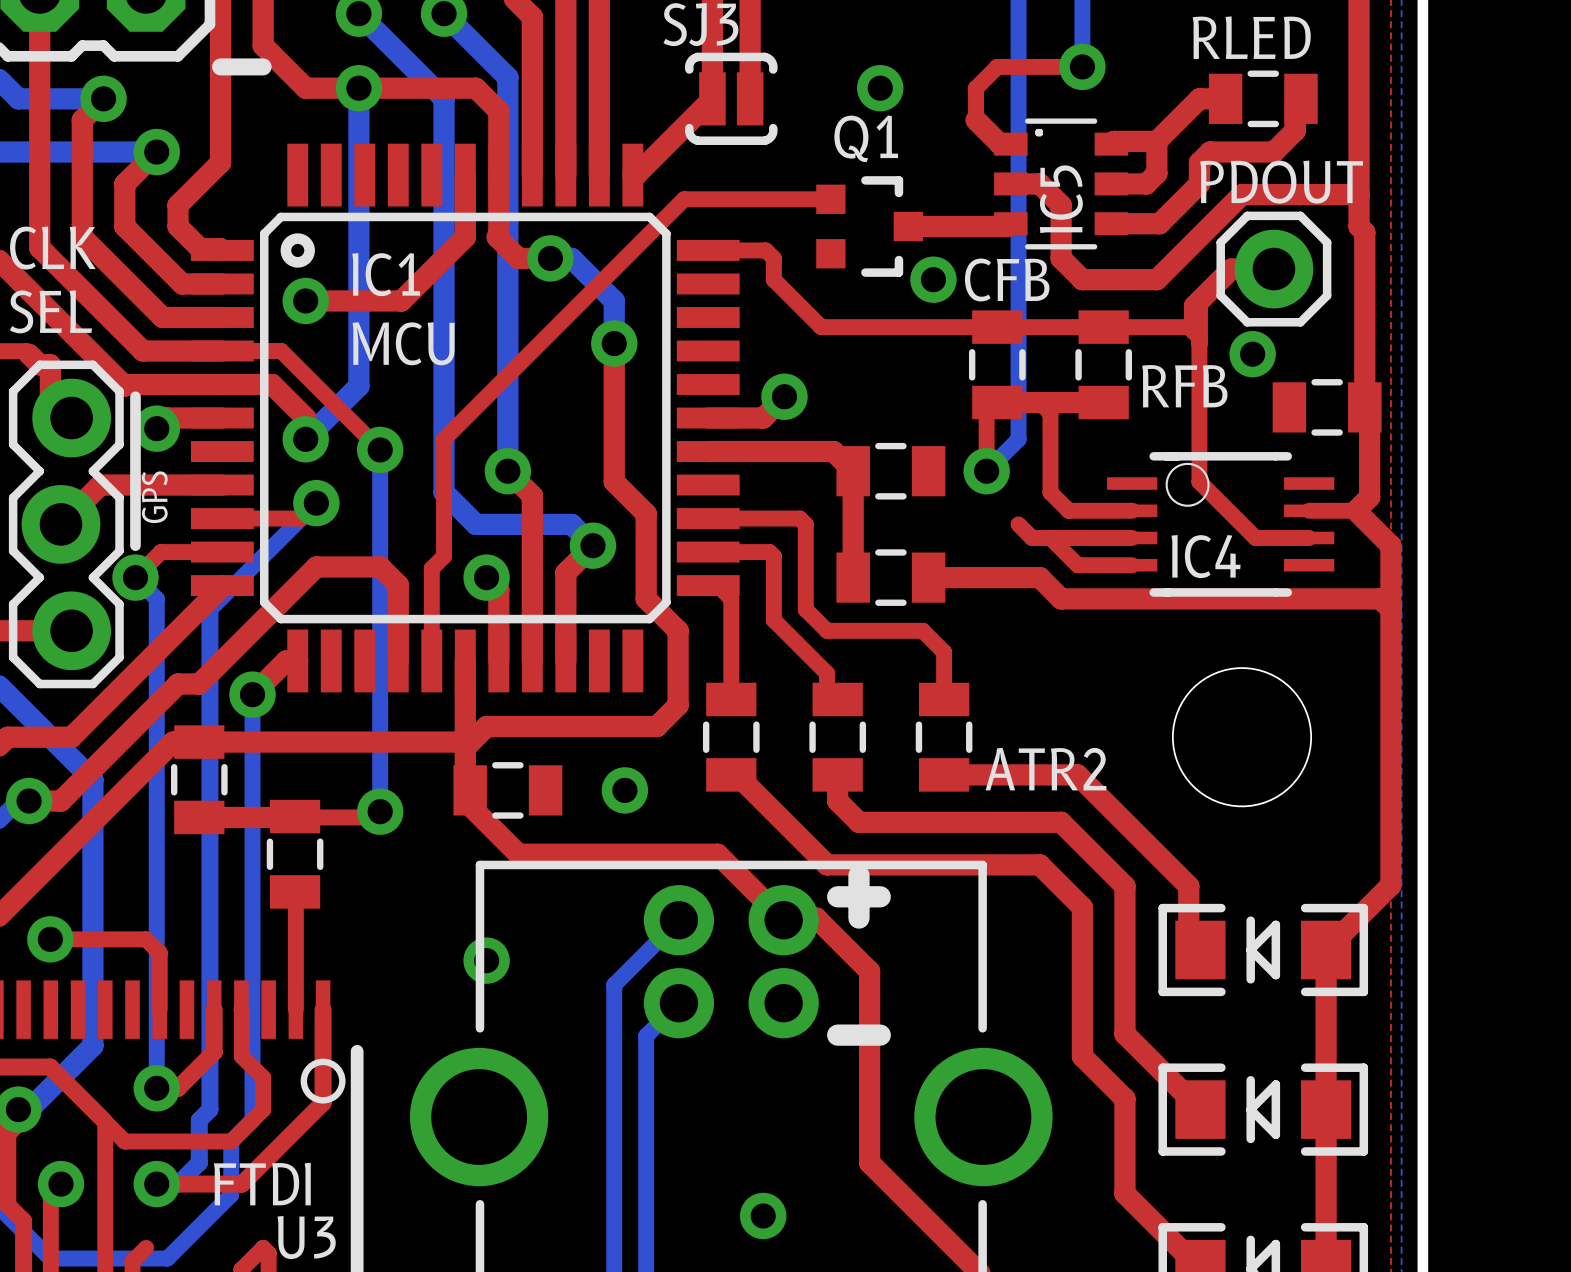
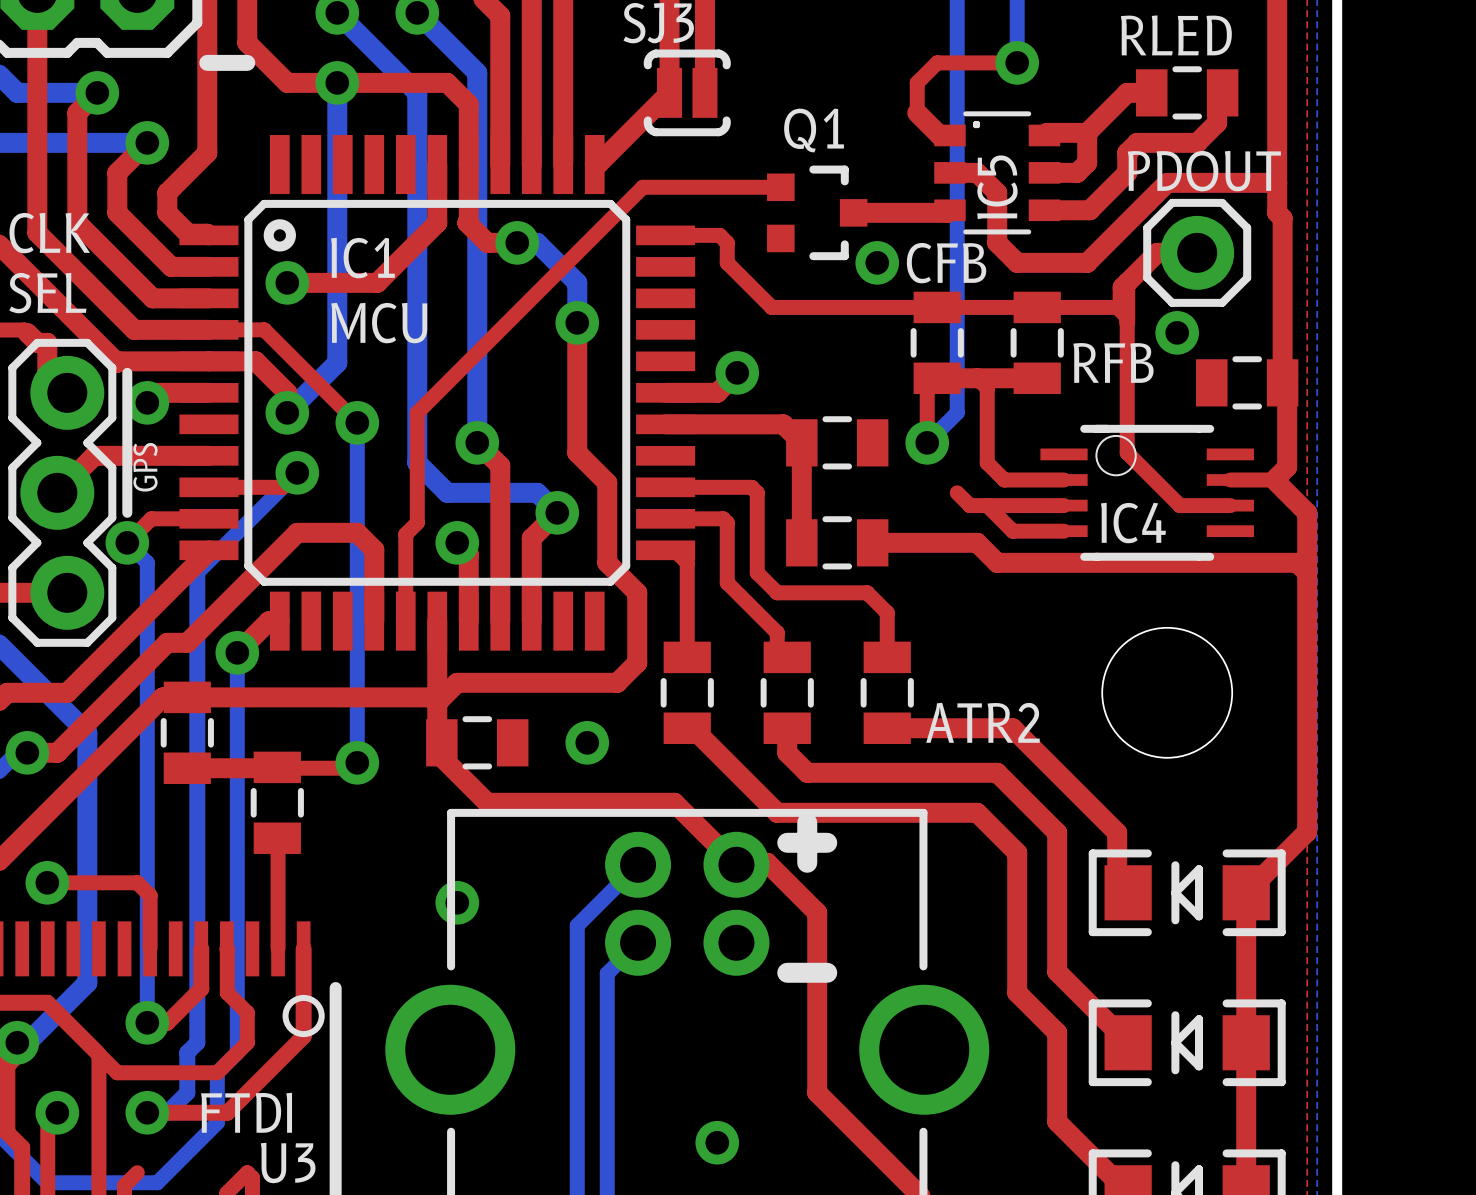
via: (880, 88) -> none

